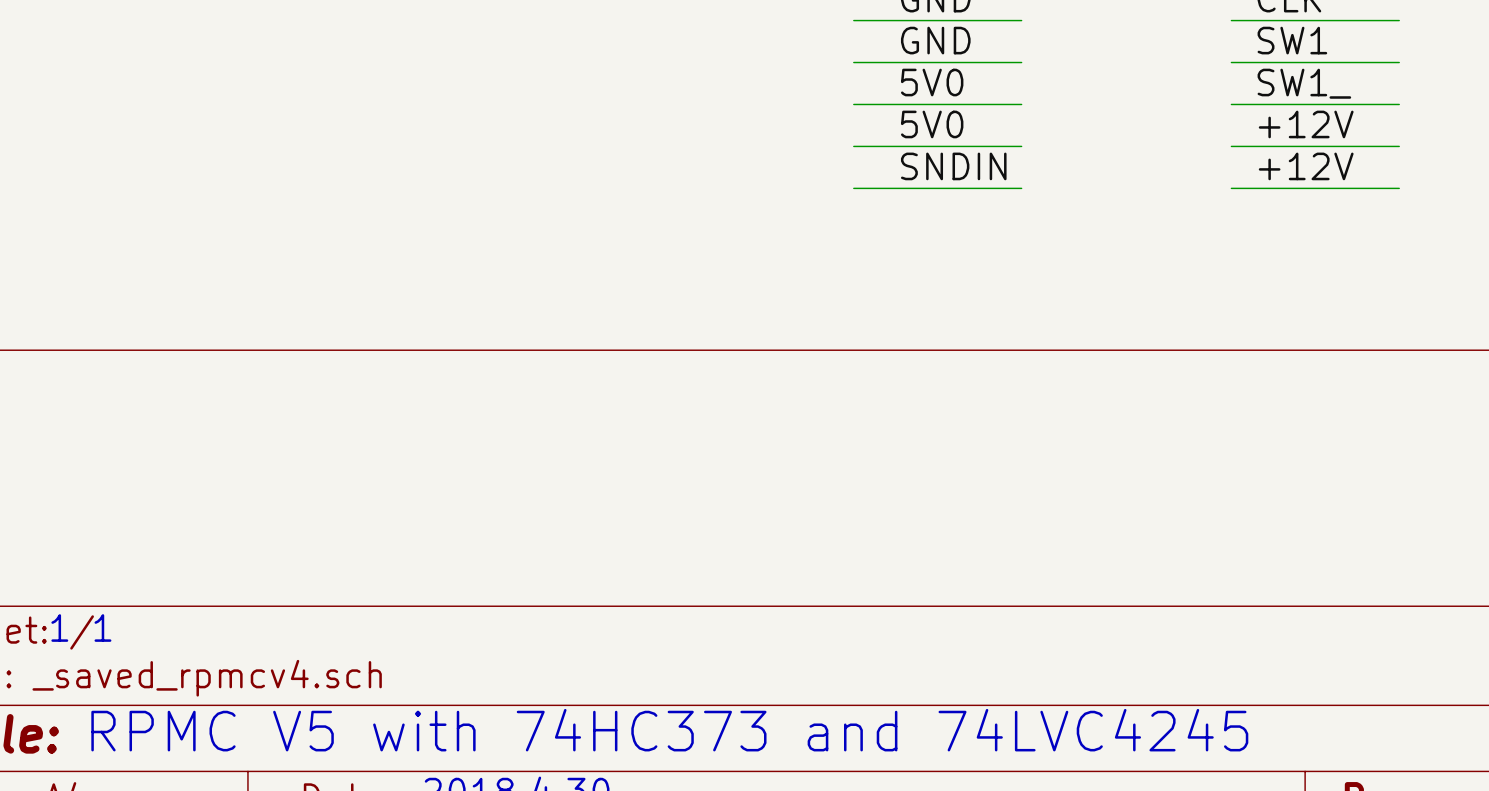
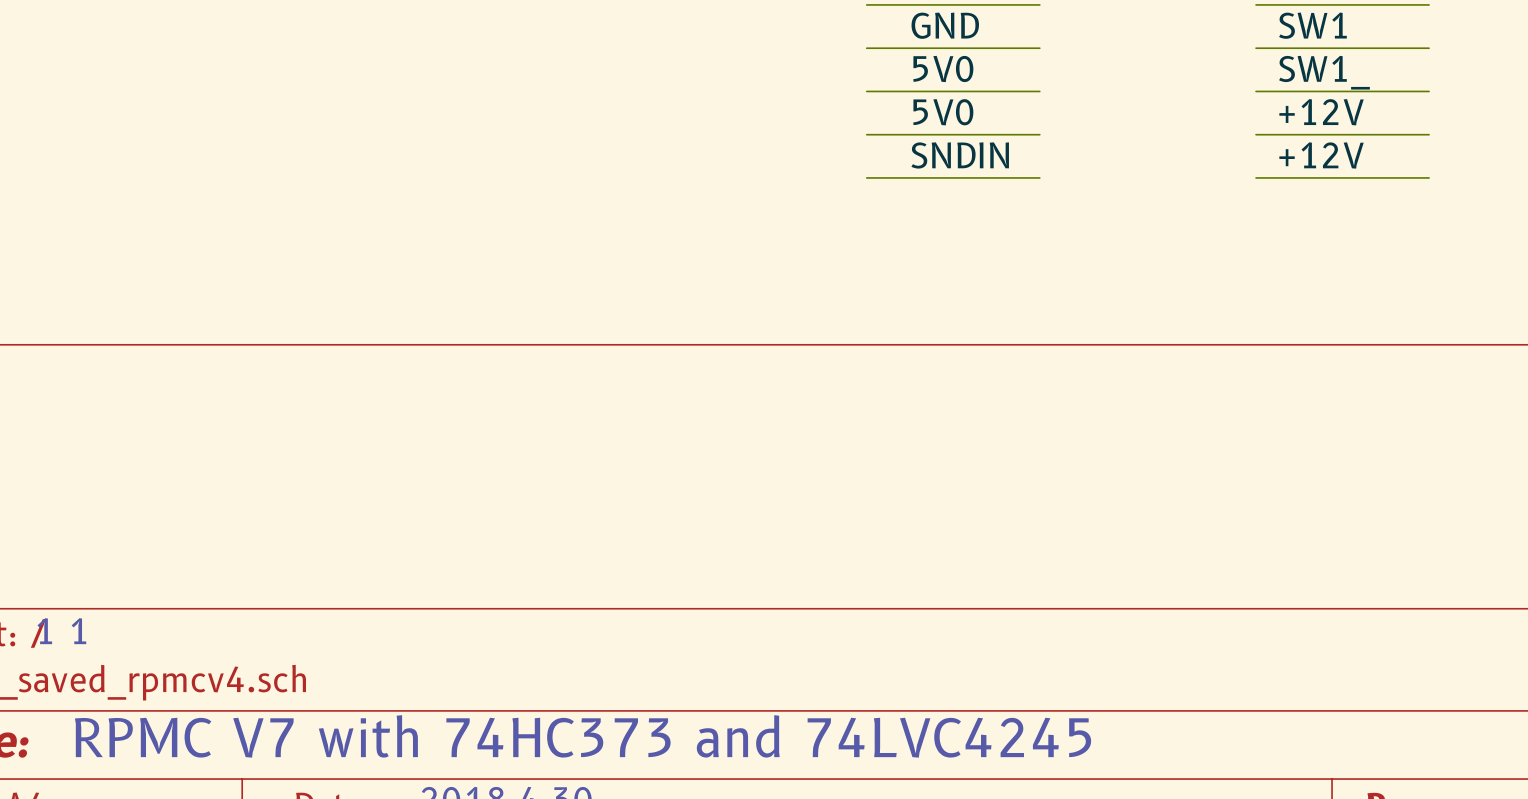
text: RPMC V5 with 74HC373 and 74LVC4245 (669, 730) -> RPMC V7 with 74HC373 and 74LVC4245 (583, 736)

